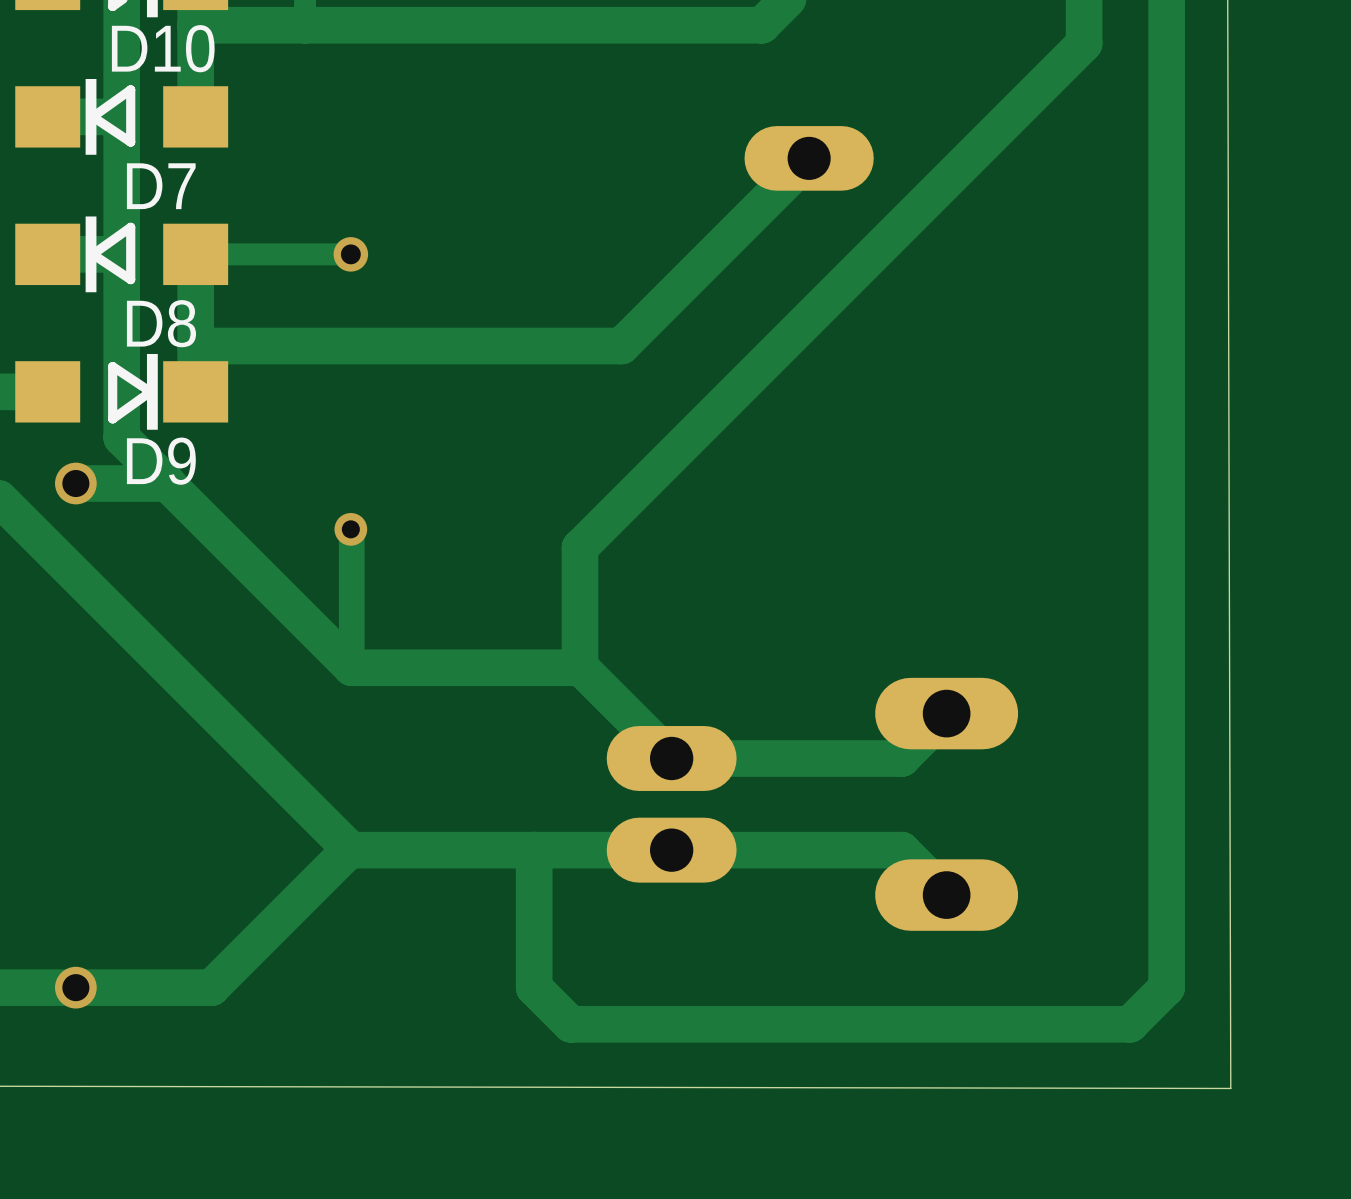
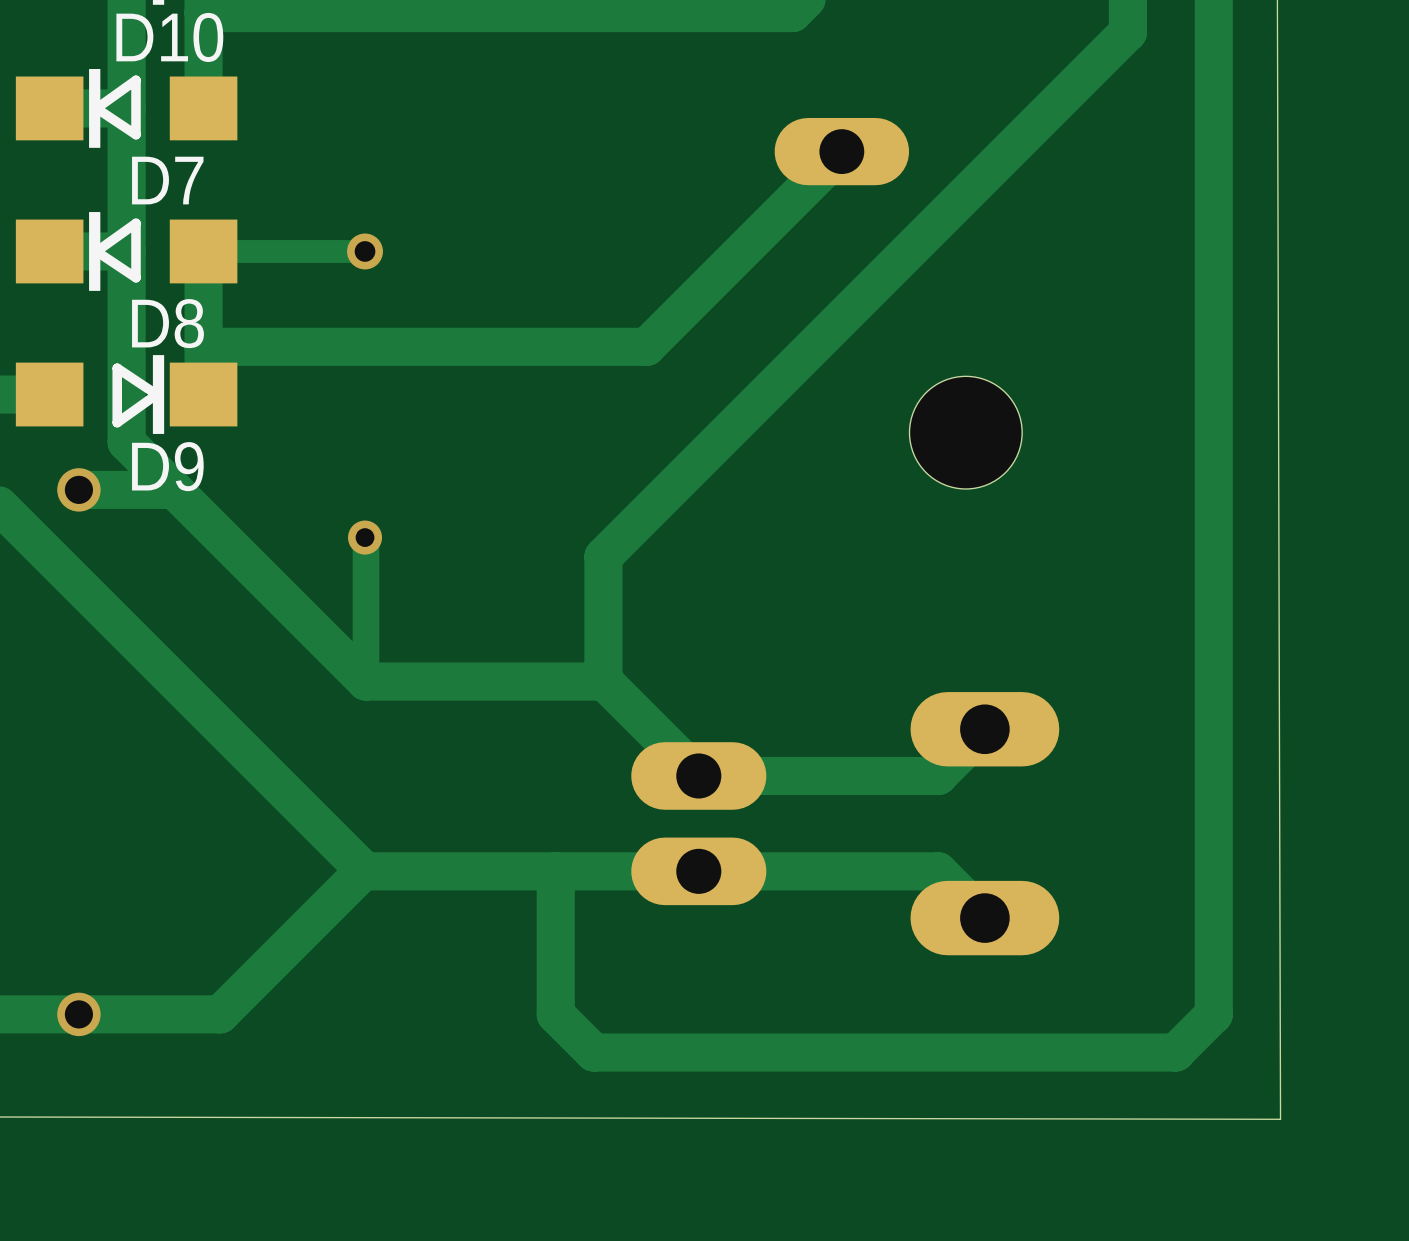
hole: none -> (965, 432)

